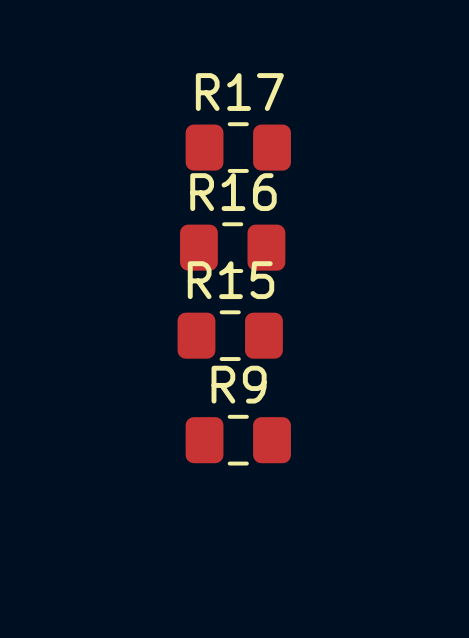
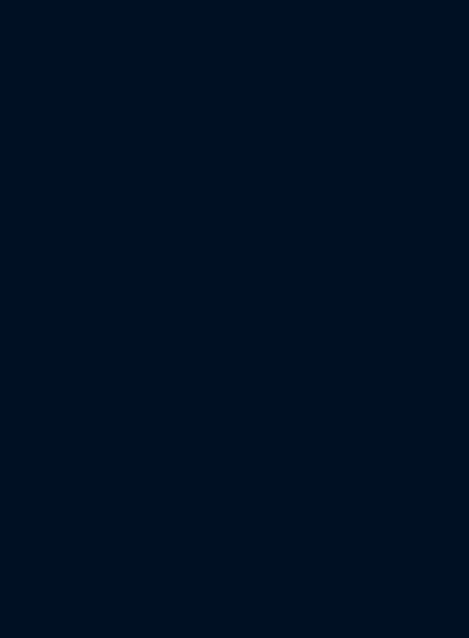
R17: (238, 147) -> none
R16: (232, 247) -> none
R15: (230, 335) -> none
R9: (238, 440) -> none

